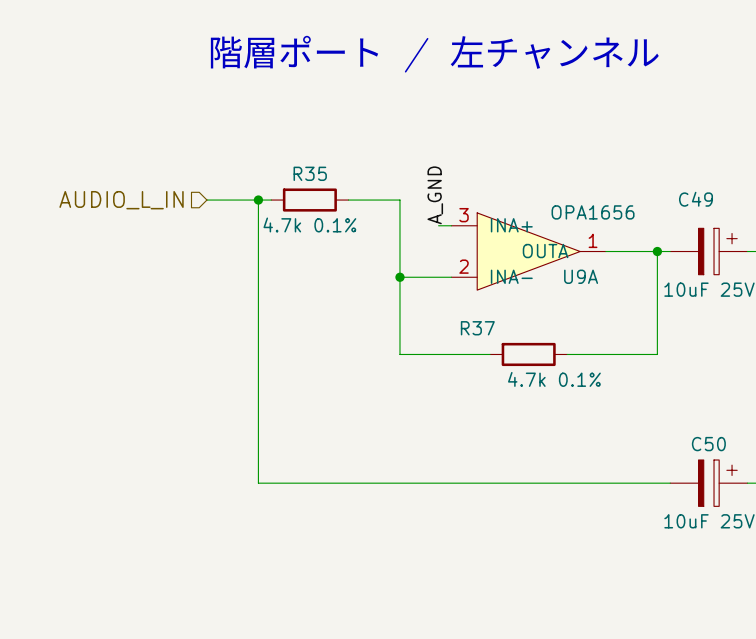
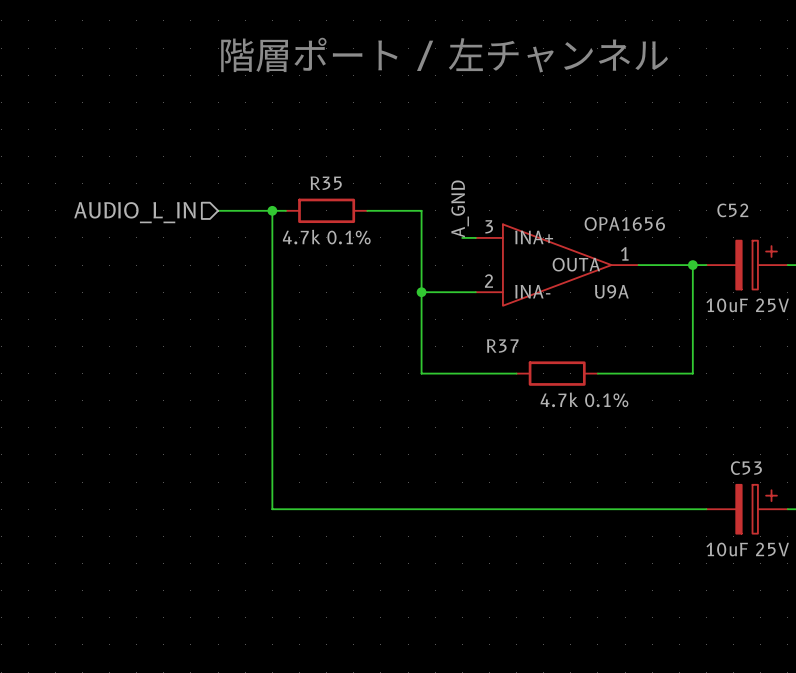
C49 name: C49 (695, 199) -> C52 (732, 210)
C50 name: C50 (708, 444) -> C53 (746, 468)

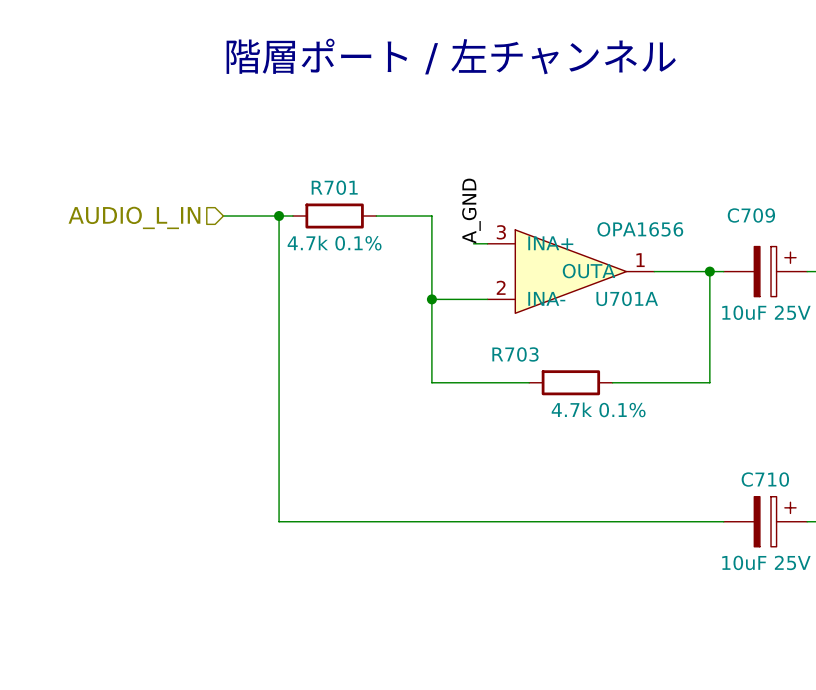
R35 name: R35 (326, 183) -> R701 (334, 187)
C52 name: C52 (732, 210) -> C709 (751, 215)
U9A name: U9A (611, 291) -> U701A (627, 298)
R37 name: R37 (502, 345) -> R703 (515, 354)
C53 name: C53 (746, 468) -> C710 (765, 479)

